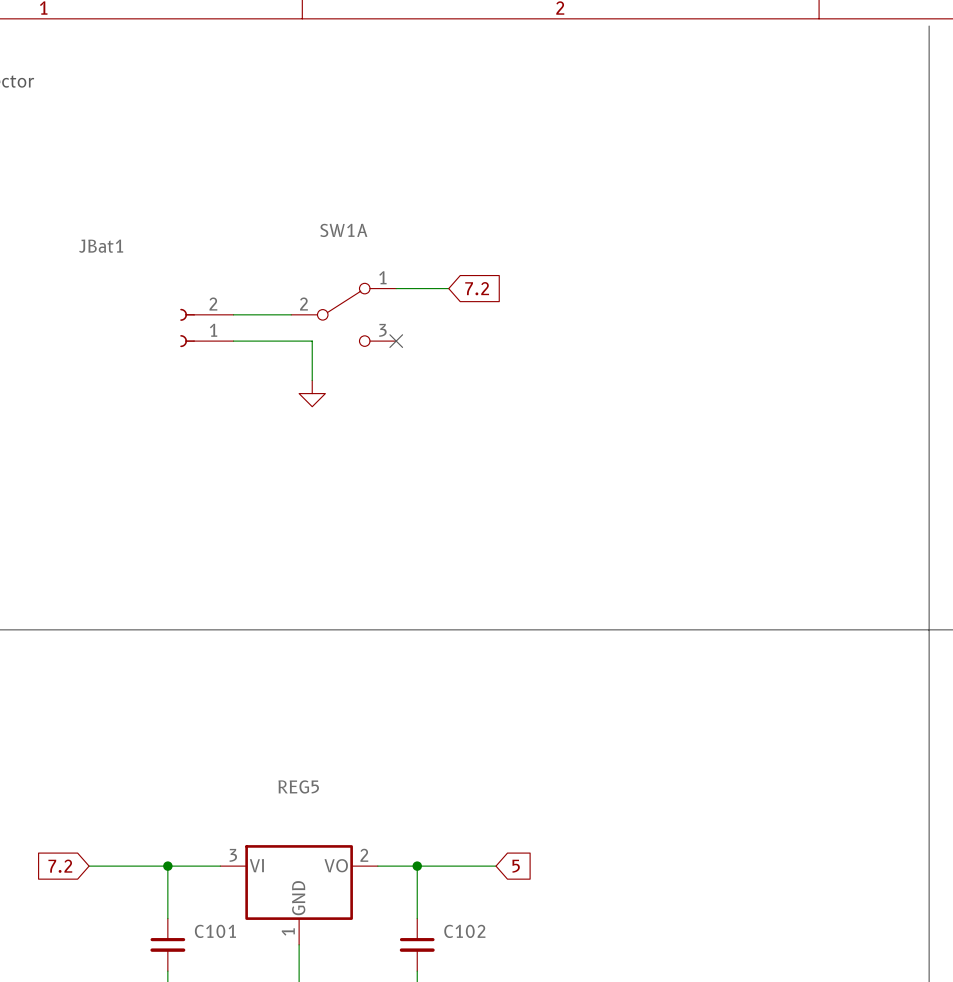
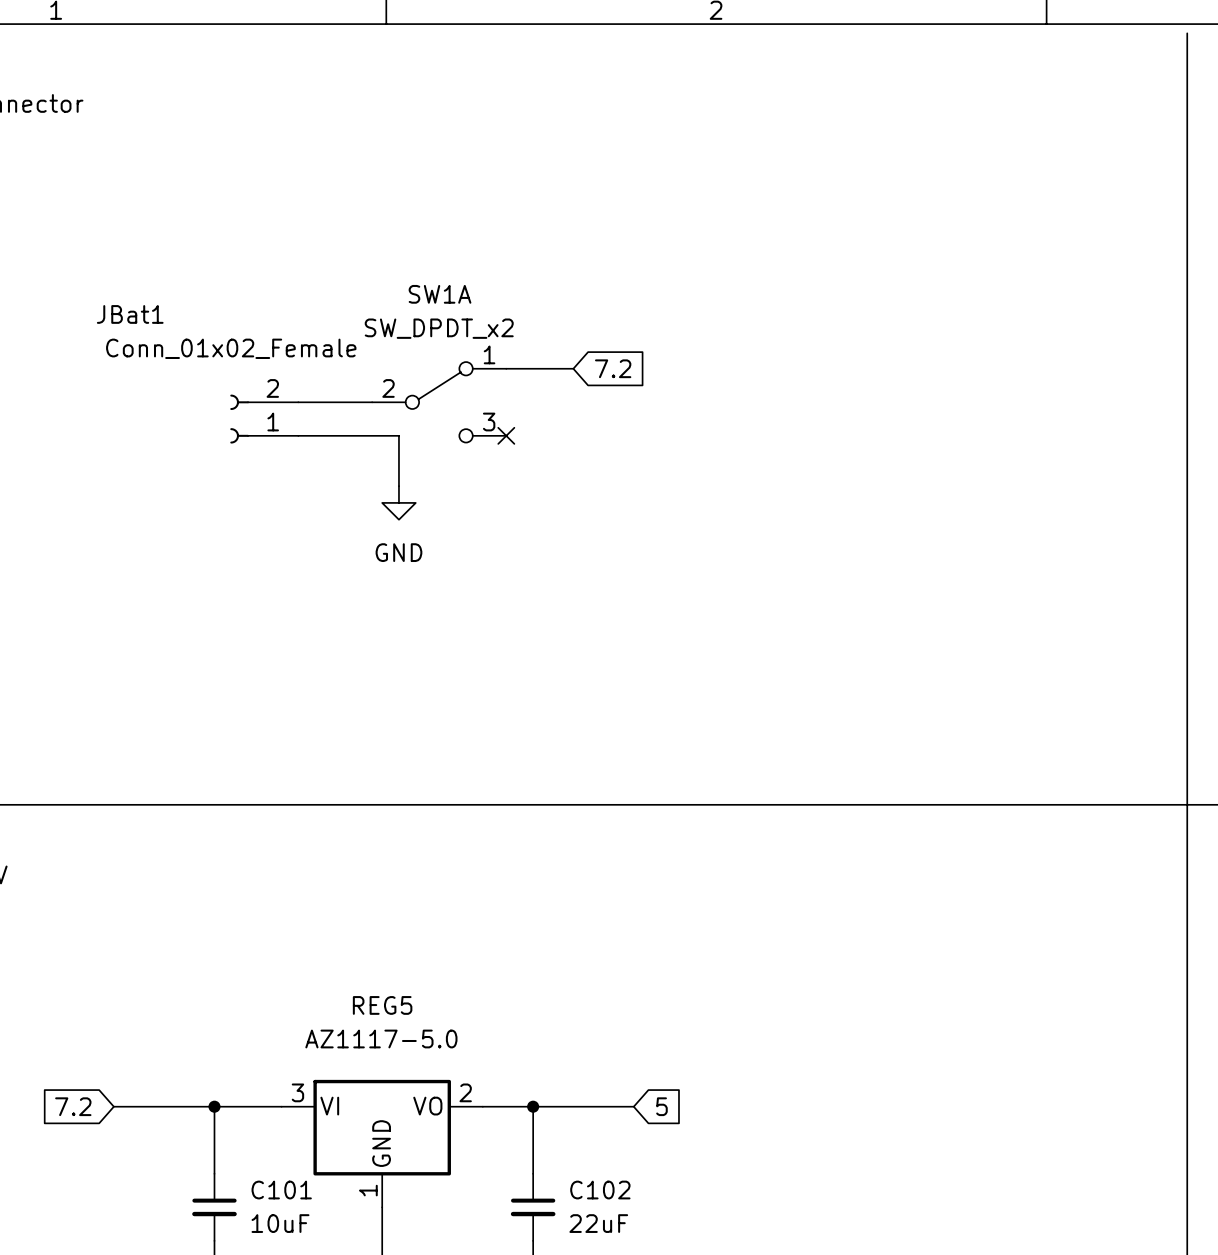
SW1A value: none -> SW_DPDT_x2 (439, 328)
JBat1 value: none -> Conn_01x02_Female (231, 348)
power symbol text: none -> GND (398, 552)
REG5 value: none -> AZ1117-5.0 (381, 1038)
C101 value: none -> 10uF (280, 1223)
C102 value: none -> 22uF (598, 1223)

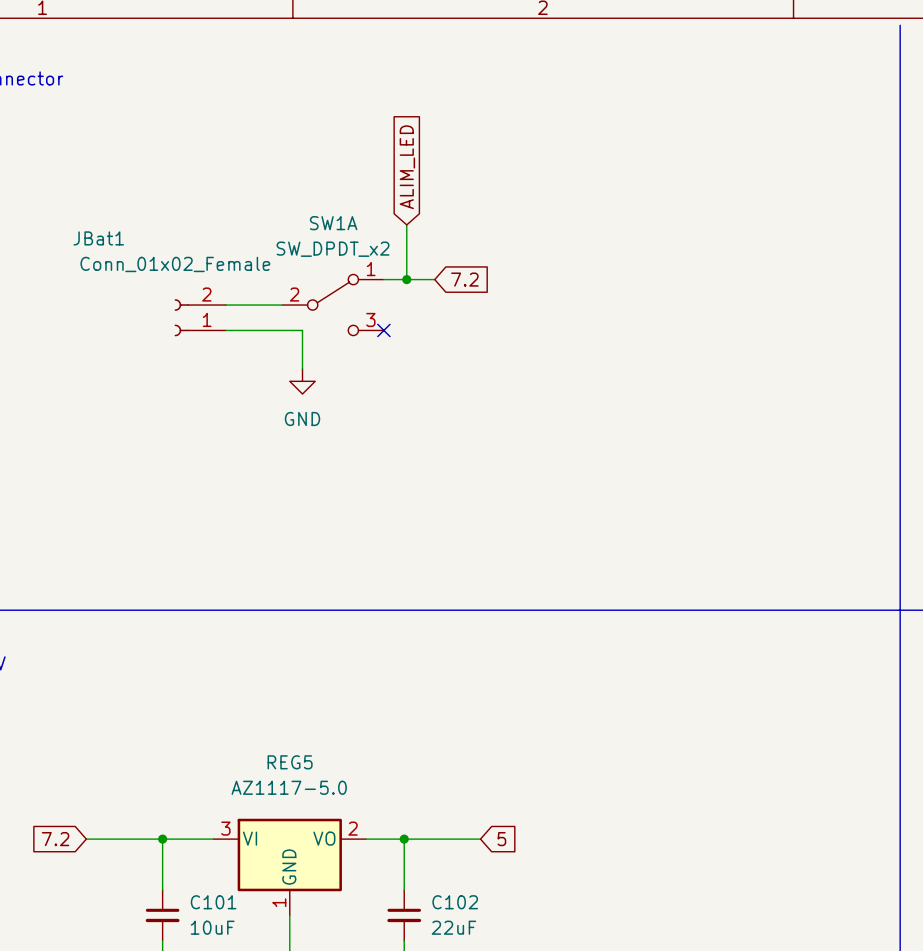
global label: none -> ALIM_LED (407, 167)
wire: none -> (406, 224) (406, 279)
junction: none -> (406, 279)

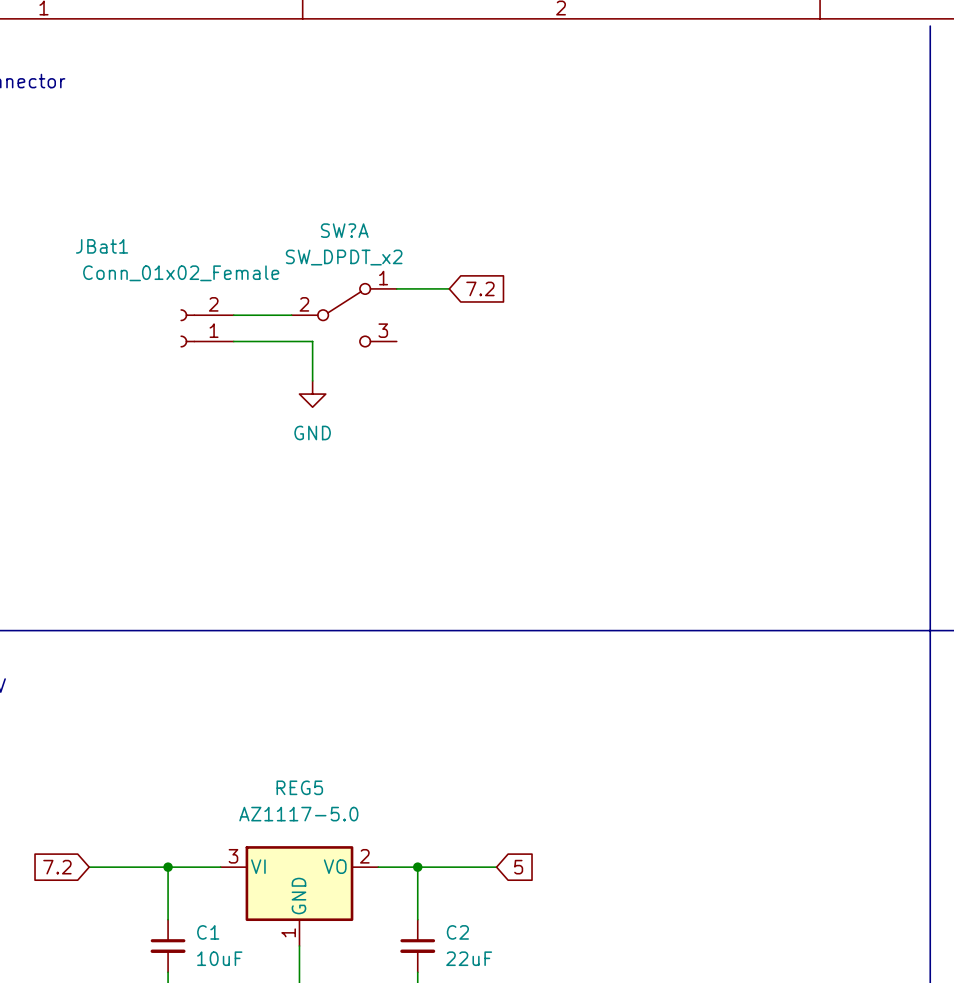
global label: ALIM_LED (407, 167) -> none
SW1A name: SW1A (333, 223) -> SW?A (344, 230)
wire: (406, 224) (406, 279) -> none
junction: (406, 279) -> none
no-connect mark: (383, 330) -> none
C101 name: C101 (213, 902) -> C1 (208, 932)
C102 name: C102 (455, 902) -> C2 (457, 932)

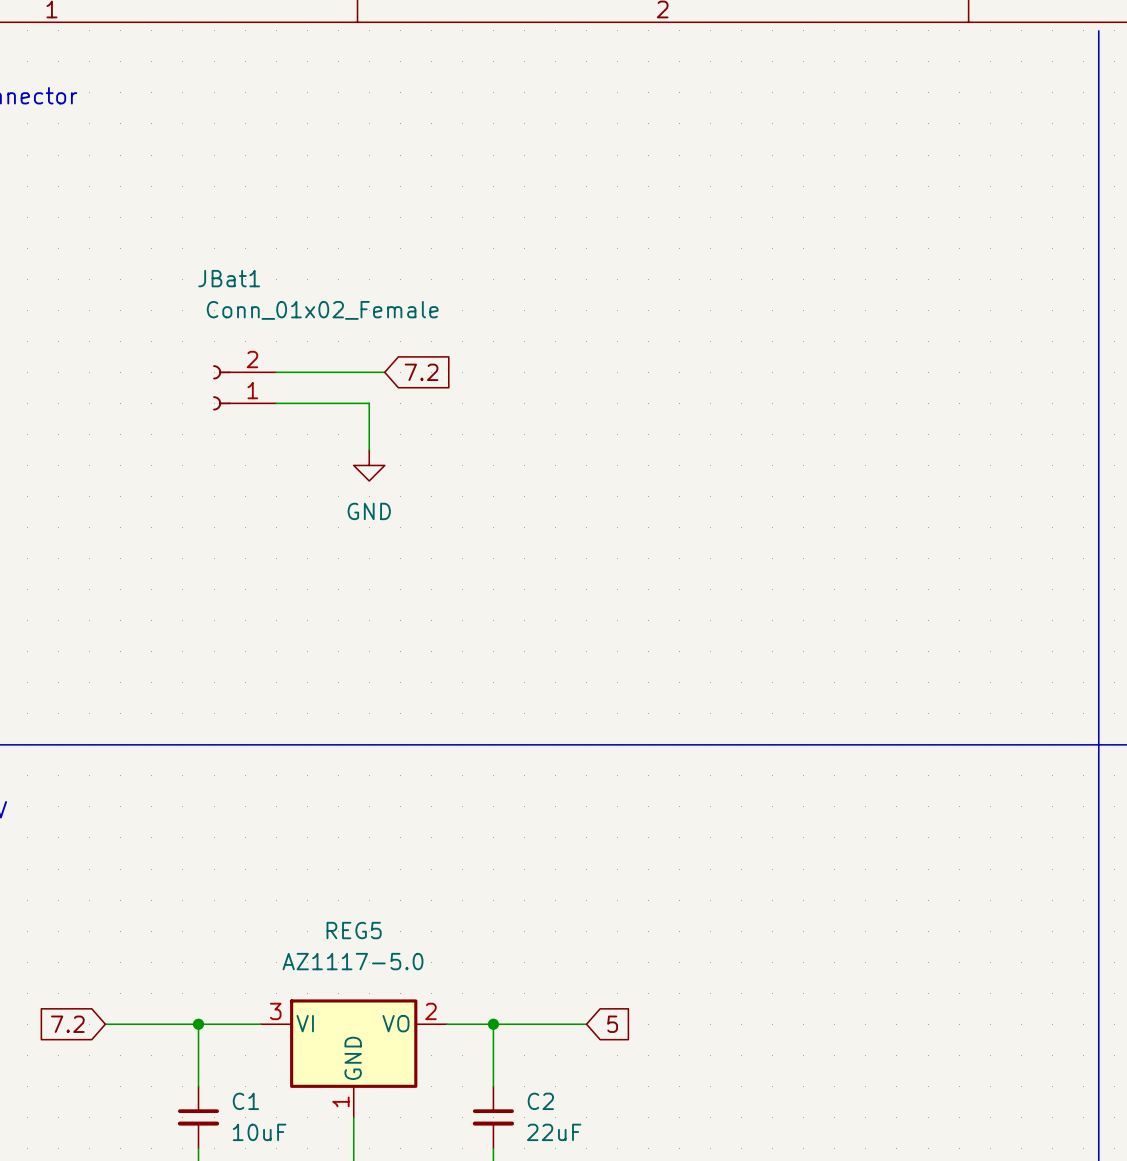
JBat1 name position: JBat1 (102, 246) -> JBat1 (229, 278)
JBat1 value position: Conn_01x02_Female (181, 273) -> Conn_01x02_Female (322, 310)
wire: (396, 288) (449, 288) -> none
global label position: 7.2 (480, 288) -> 7.2 (421, 372)
SW?A: SW_DPDT_x2 (344, 315) -> none

